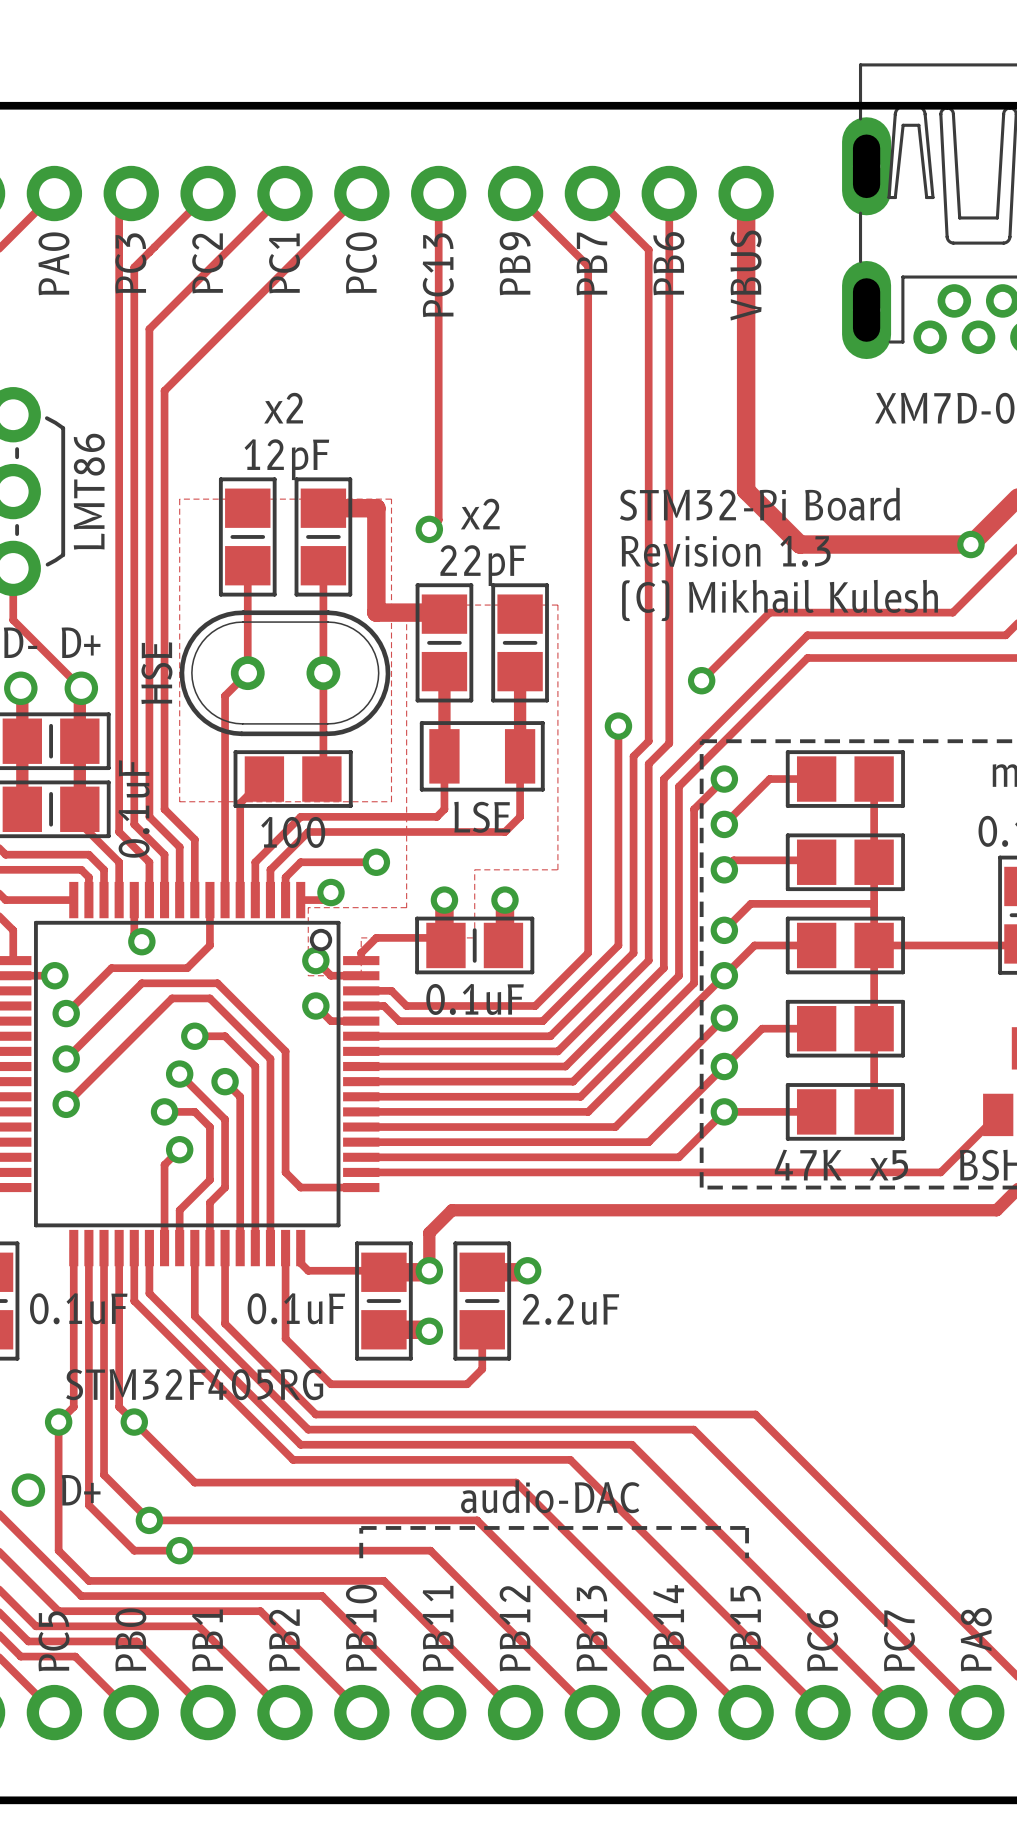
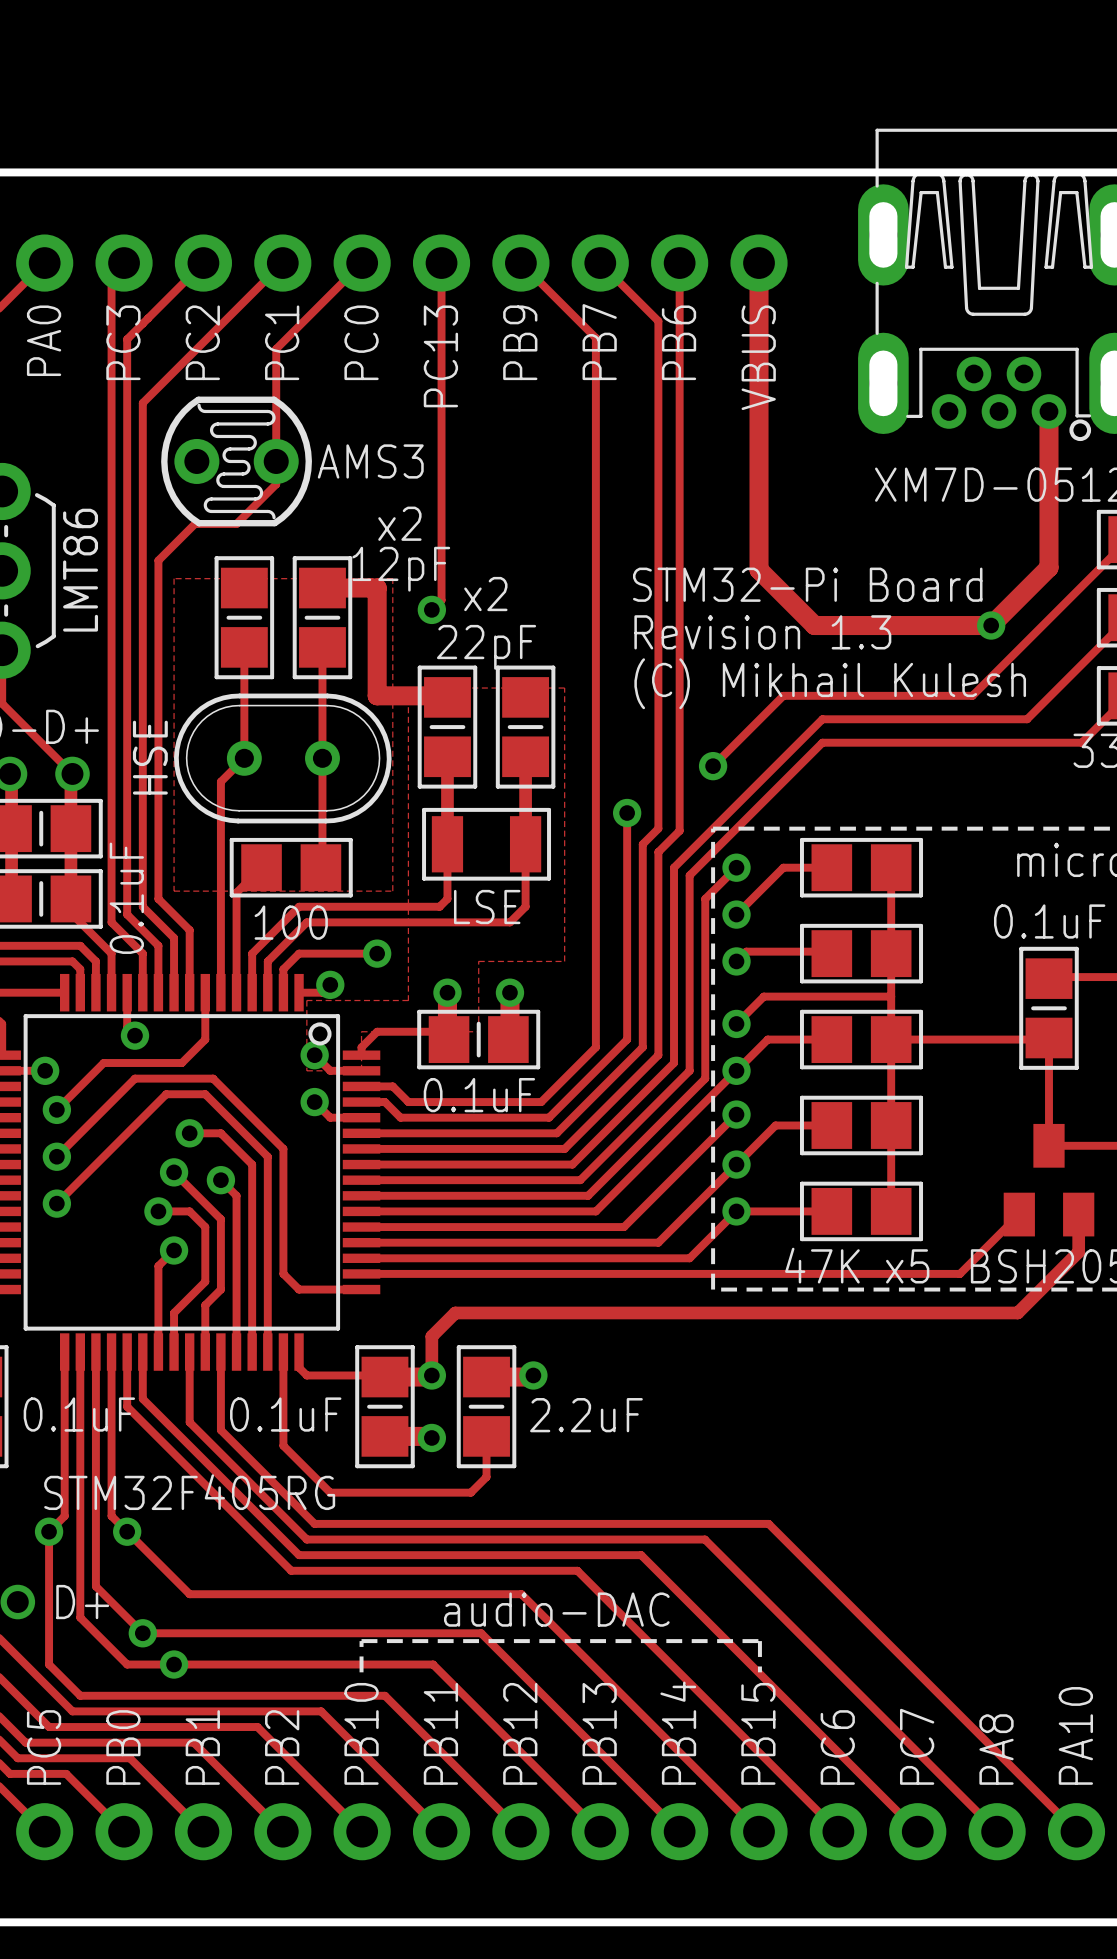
track: (278, 276) (164, 390) (164, 481) -> (276, 348) (276, 484) (236, 523) (194, 523) (158, 560)
part: none -> AMS3 (236, 461)
text position: x2 (283, 408) -> x2 (399, 523)
part value position: 12pF (286, 459) -> 12pF (401, 569)

